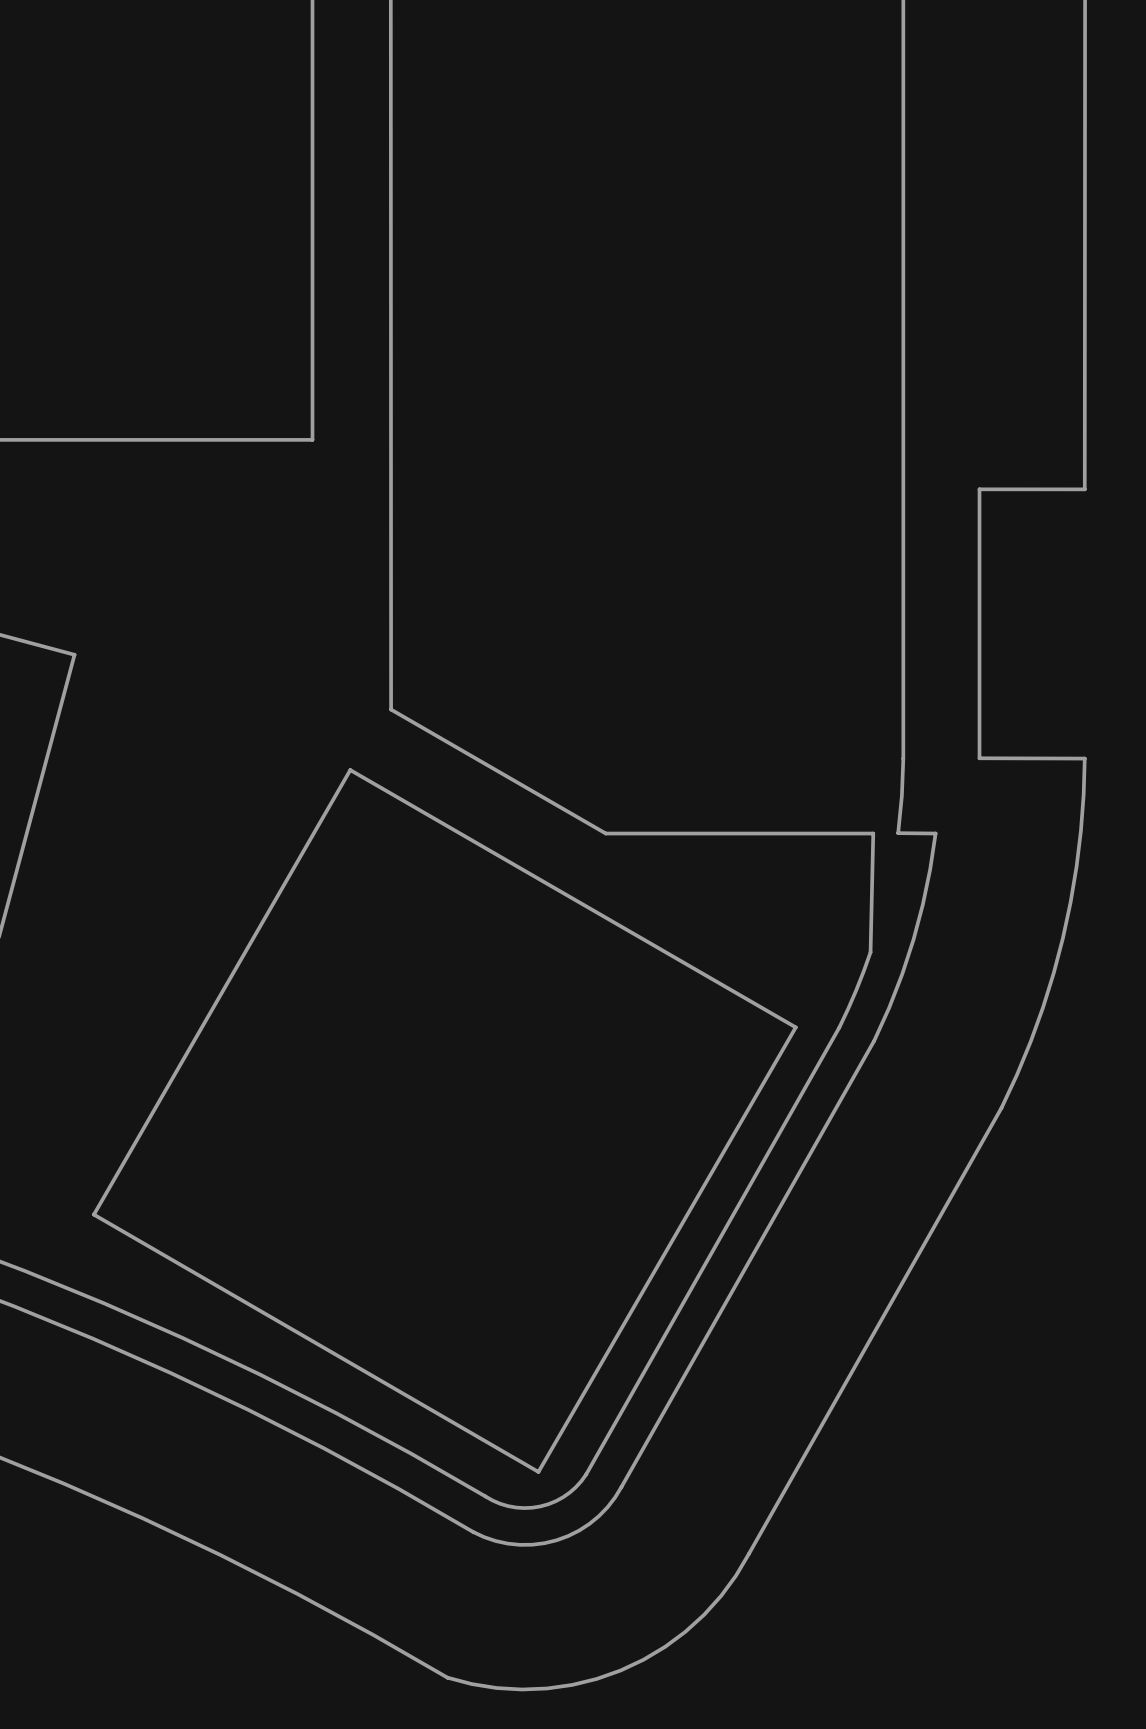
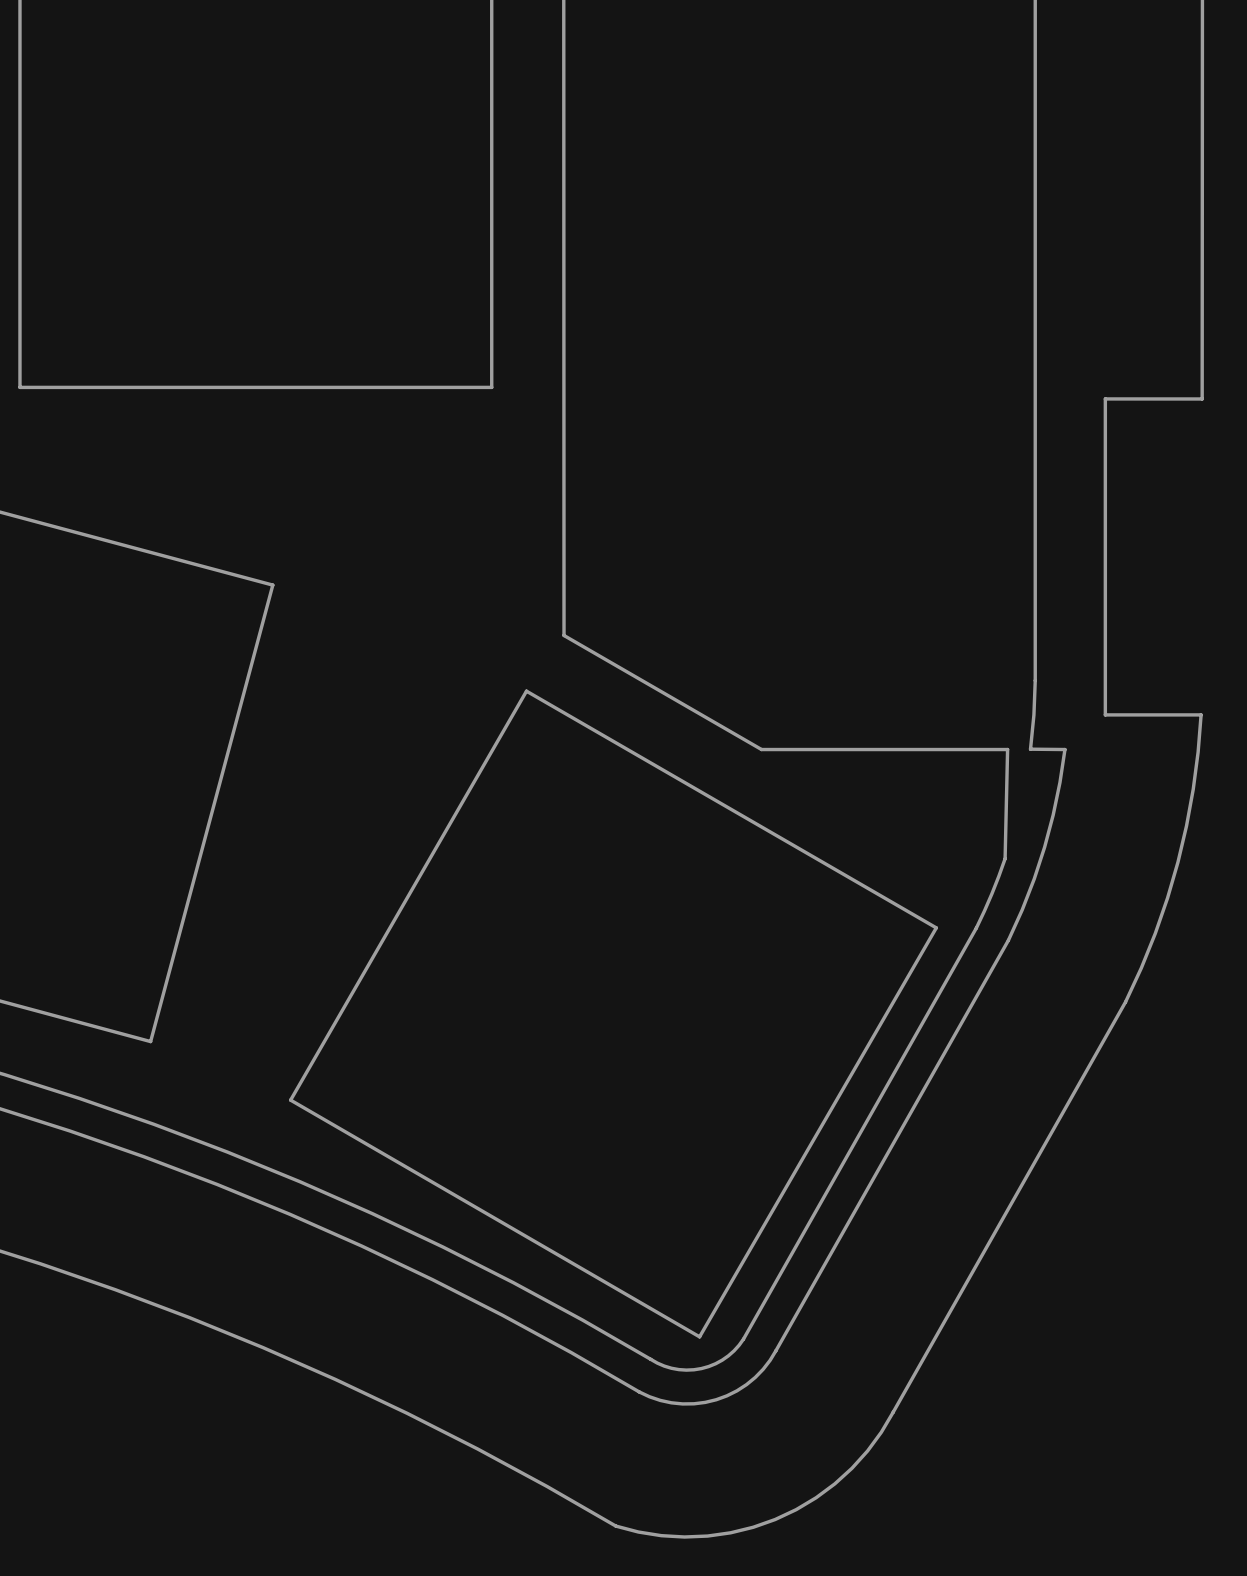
board edge: (1084, 452) (1084, 489) (979, 489) -> (1202, 398) (1105, 398) (1105, 432)
board edge: (979, 758) (1084, 758) (1080, 830) (1076, 866) (1062, 937) (1053, 973) (1030, 1041) (1001, 1107) -> (1105, 680) (1105, 714) (1201, 714) (1193, 789) (1177, 862) (1155, 933) (1125, 1002)

